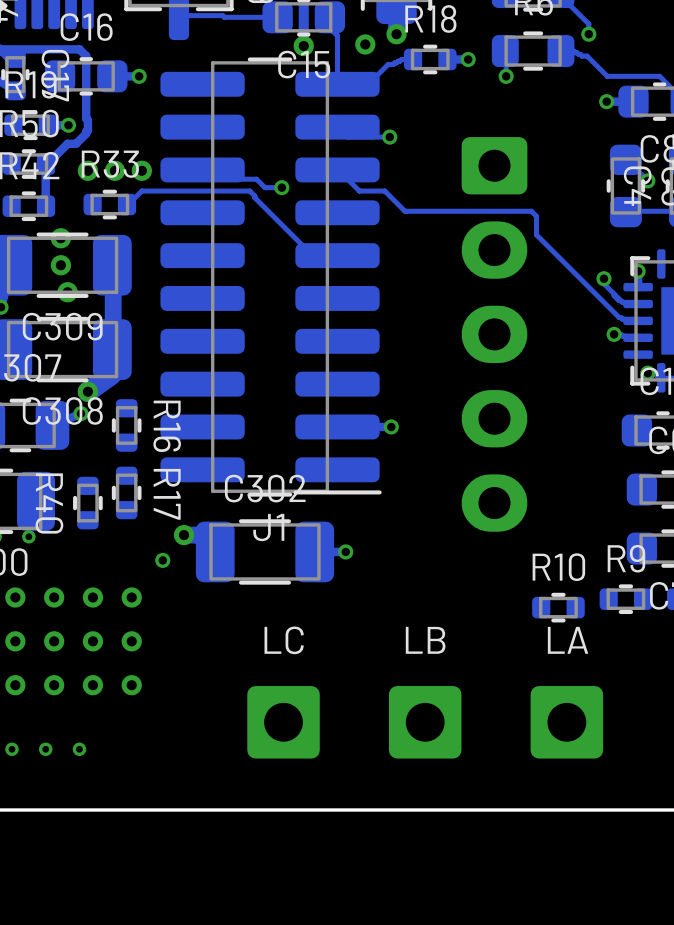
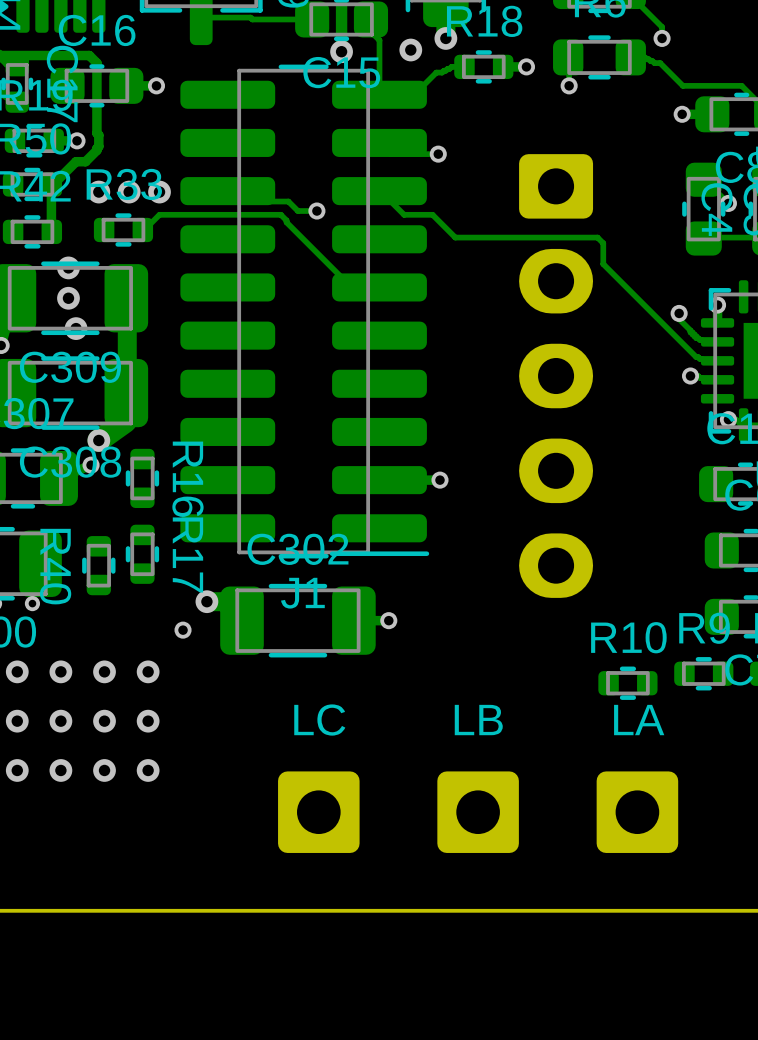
via: (11, 749) -> none
via: (45, 749) -> none
via: (79, 749) -> none

